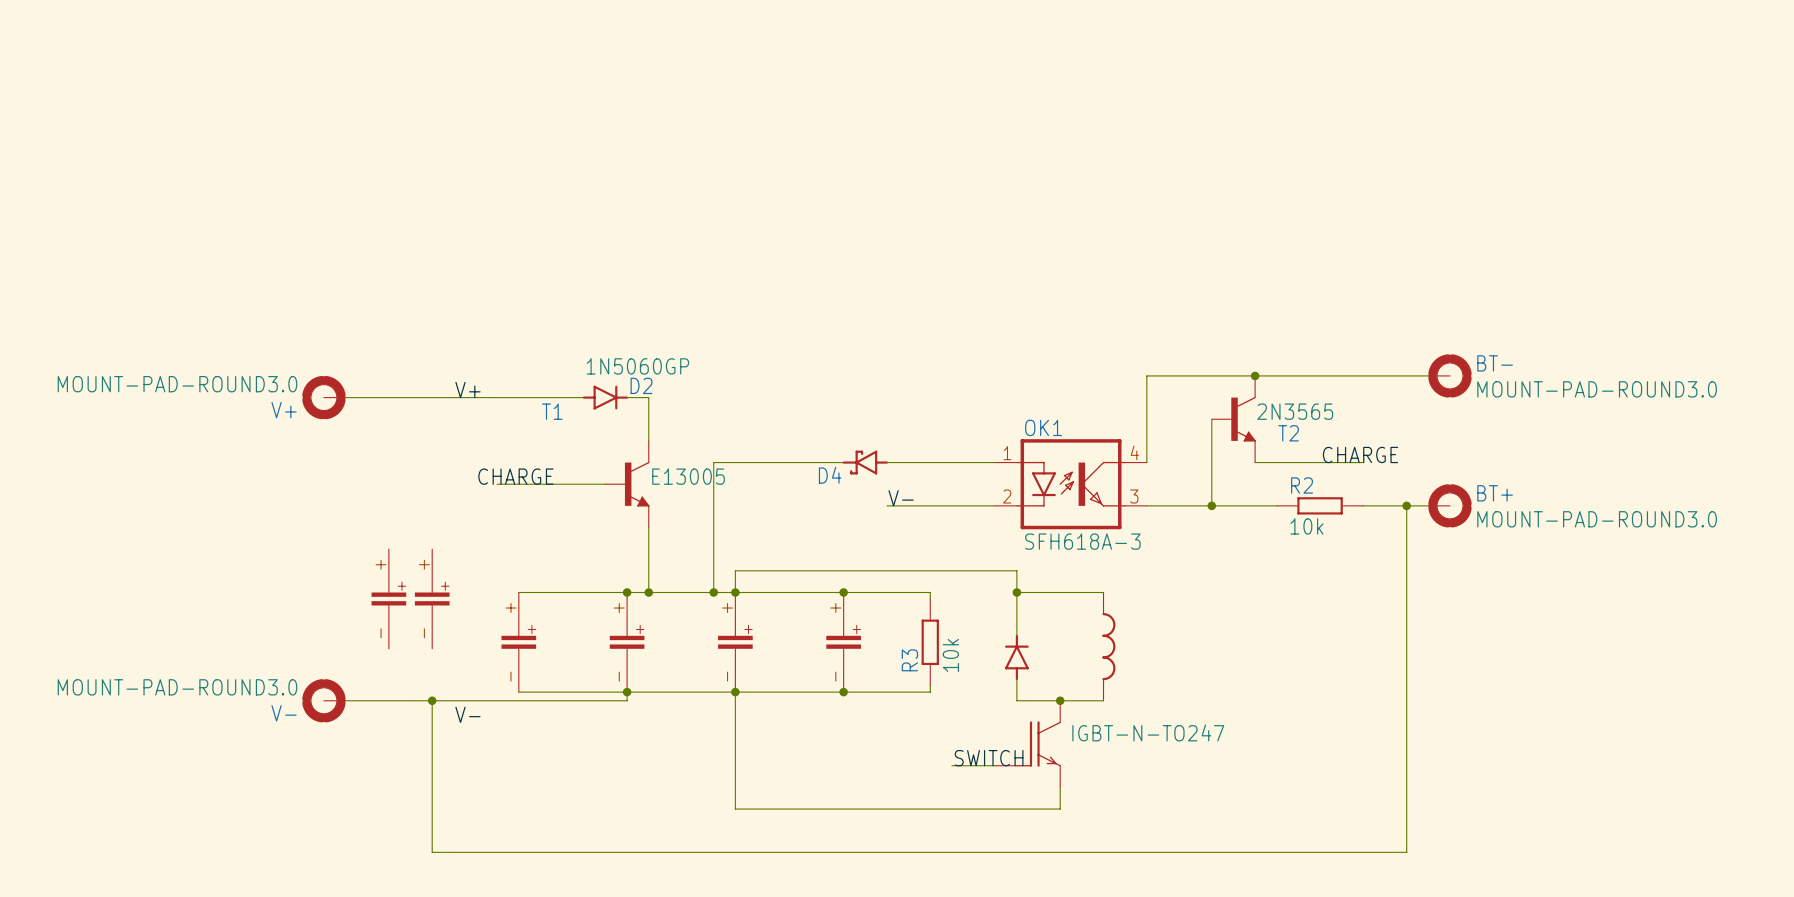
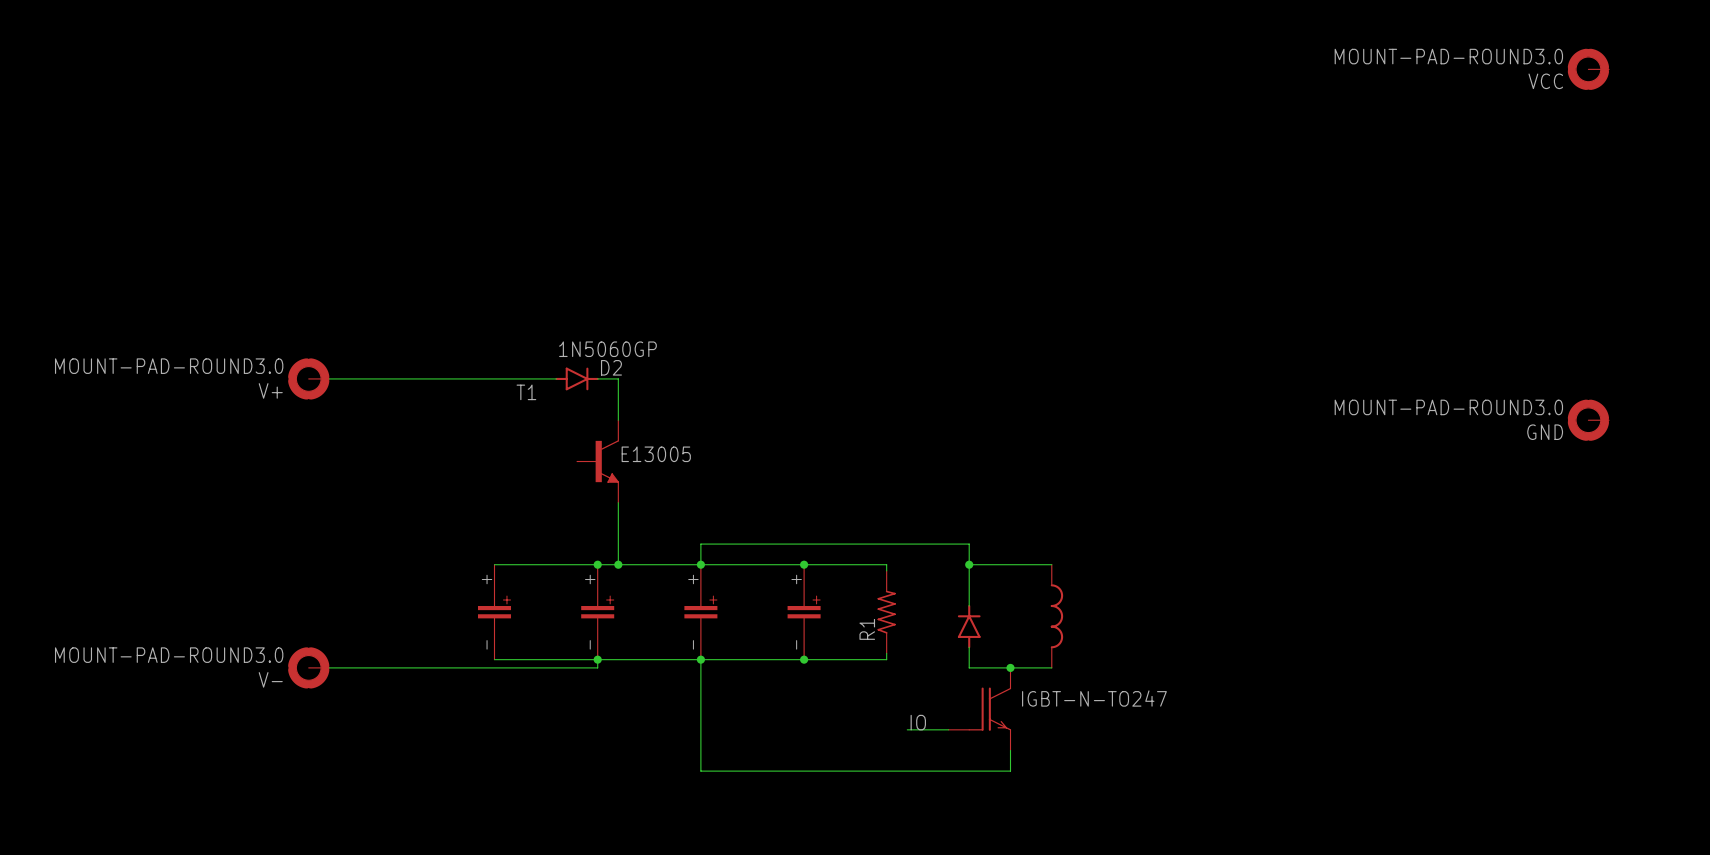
VCC: none -> MOUNT-PAD-ROUND3.0 (1588, 69)
junction: (1255, 375) -> none
wire: (1428, 375) (1146, 375) (1146, 462) -> none
BT-: MOUNT-PAD-ROUND3.0 (1450, 375) -> none
label: V+ (467, 390) -> none
wire: (1211, 419) (1211, 505) -> none
T2: 2N3565 (1233, 419) -> none
GND: none -> MOUNT-PAD-ROUND3.0 (1588, 420)
label: CHARGE (1360, 454) -> none
wire: (843, 462) (713, 462) (713, 592) -> none
D4: (865, 462) -> none
wire: (886, 462) (995, 462) -> none
wire: (1255, 462) (1363, 462) -> none
label: CHARGE (515, 476) -> none
wire: (497, 484) (605, 484) -> none
OK1: SFH618A-3 (1071, 484) -> none
label: V- (901, 498) -> none
wire: (886, 505) (995, 505) -> none
wire: (1146, 505) (1276, 505) -> none
junction: (1211, 505) -> none
R2: 10k (1320, 505) -> none
wire: (1363, 505) (1428, 505) -> none
wire: (1406, 505) (1406, 852) (432, 852) (432, 700) -> none
junction: (1406, 505) -> none
BT+: MOUNT-PAD-ROUND3.0 (1450, 505) -> none
junction: (713, 592) -> none
part: (388, 598) -> none
part: (432, 598) -> none
R3: 10k (930, 642) -> none
R1: none -> (886, 612)
junction: (432, 700) -> none
label: V- (467, 714) -> none
label: SWITCH (989, 758) -> IO (918, 722)

